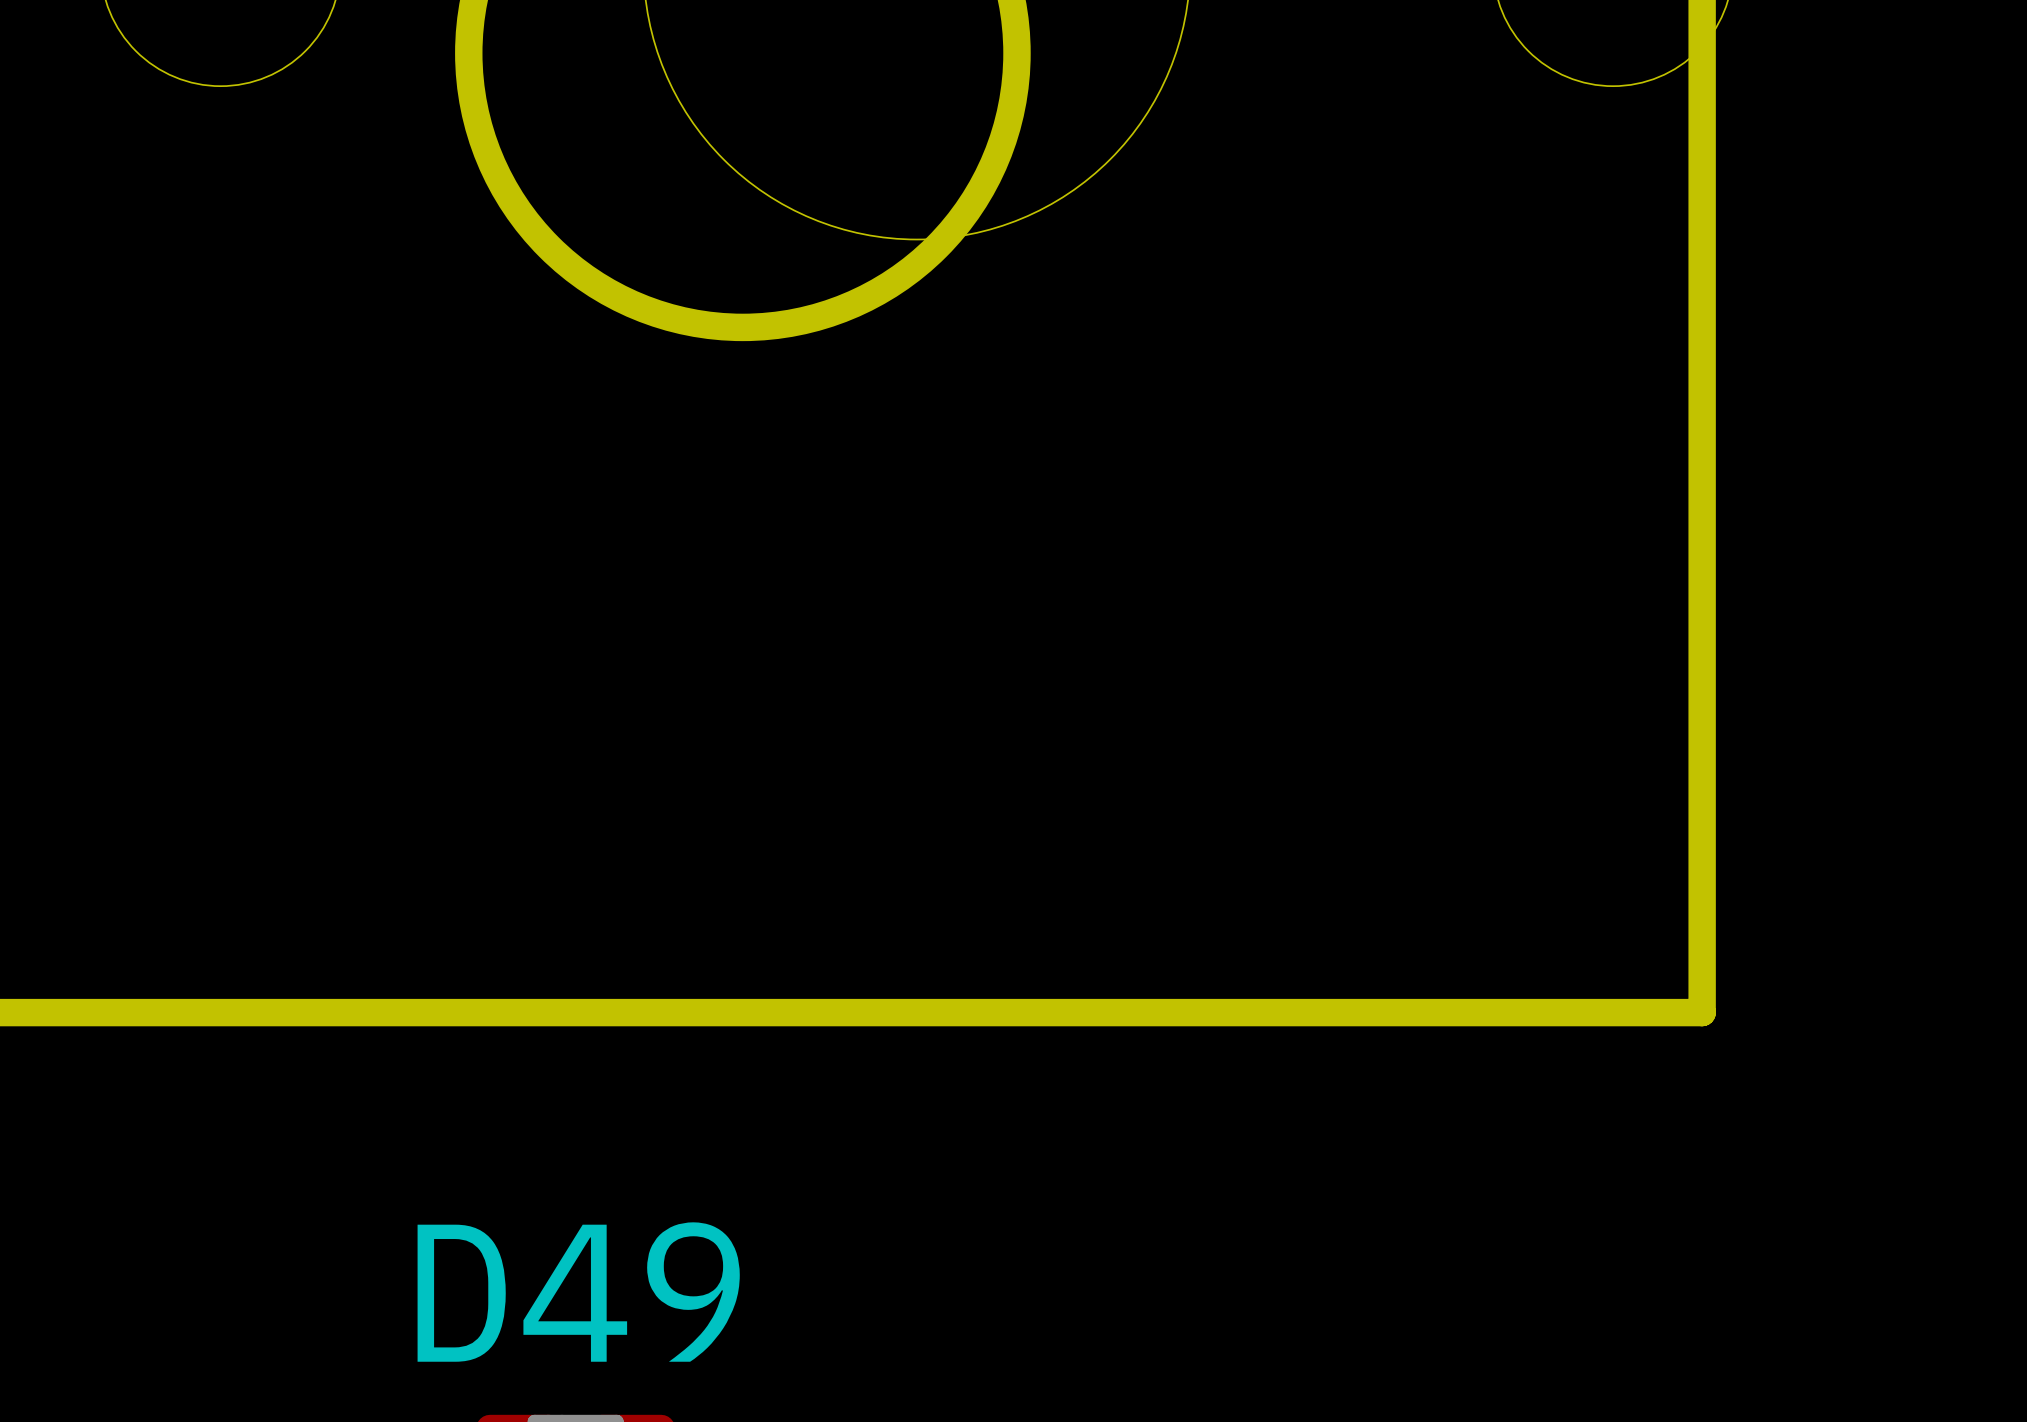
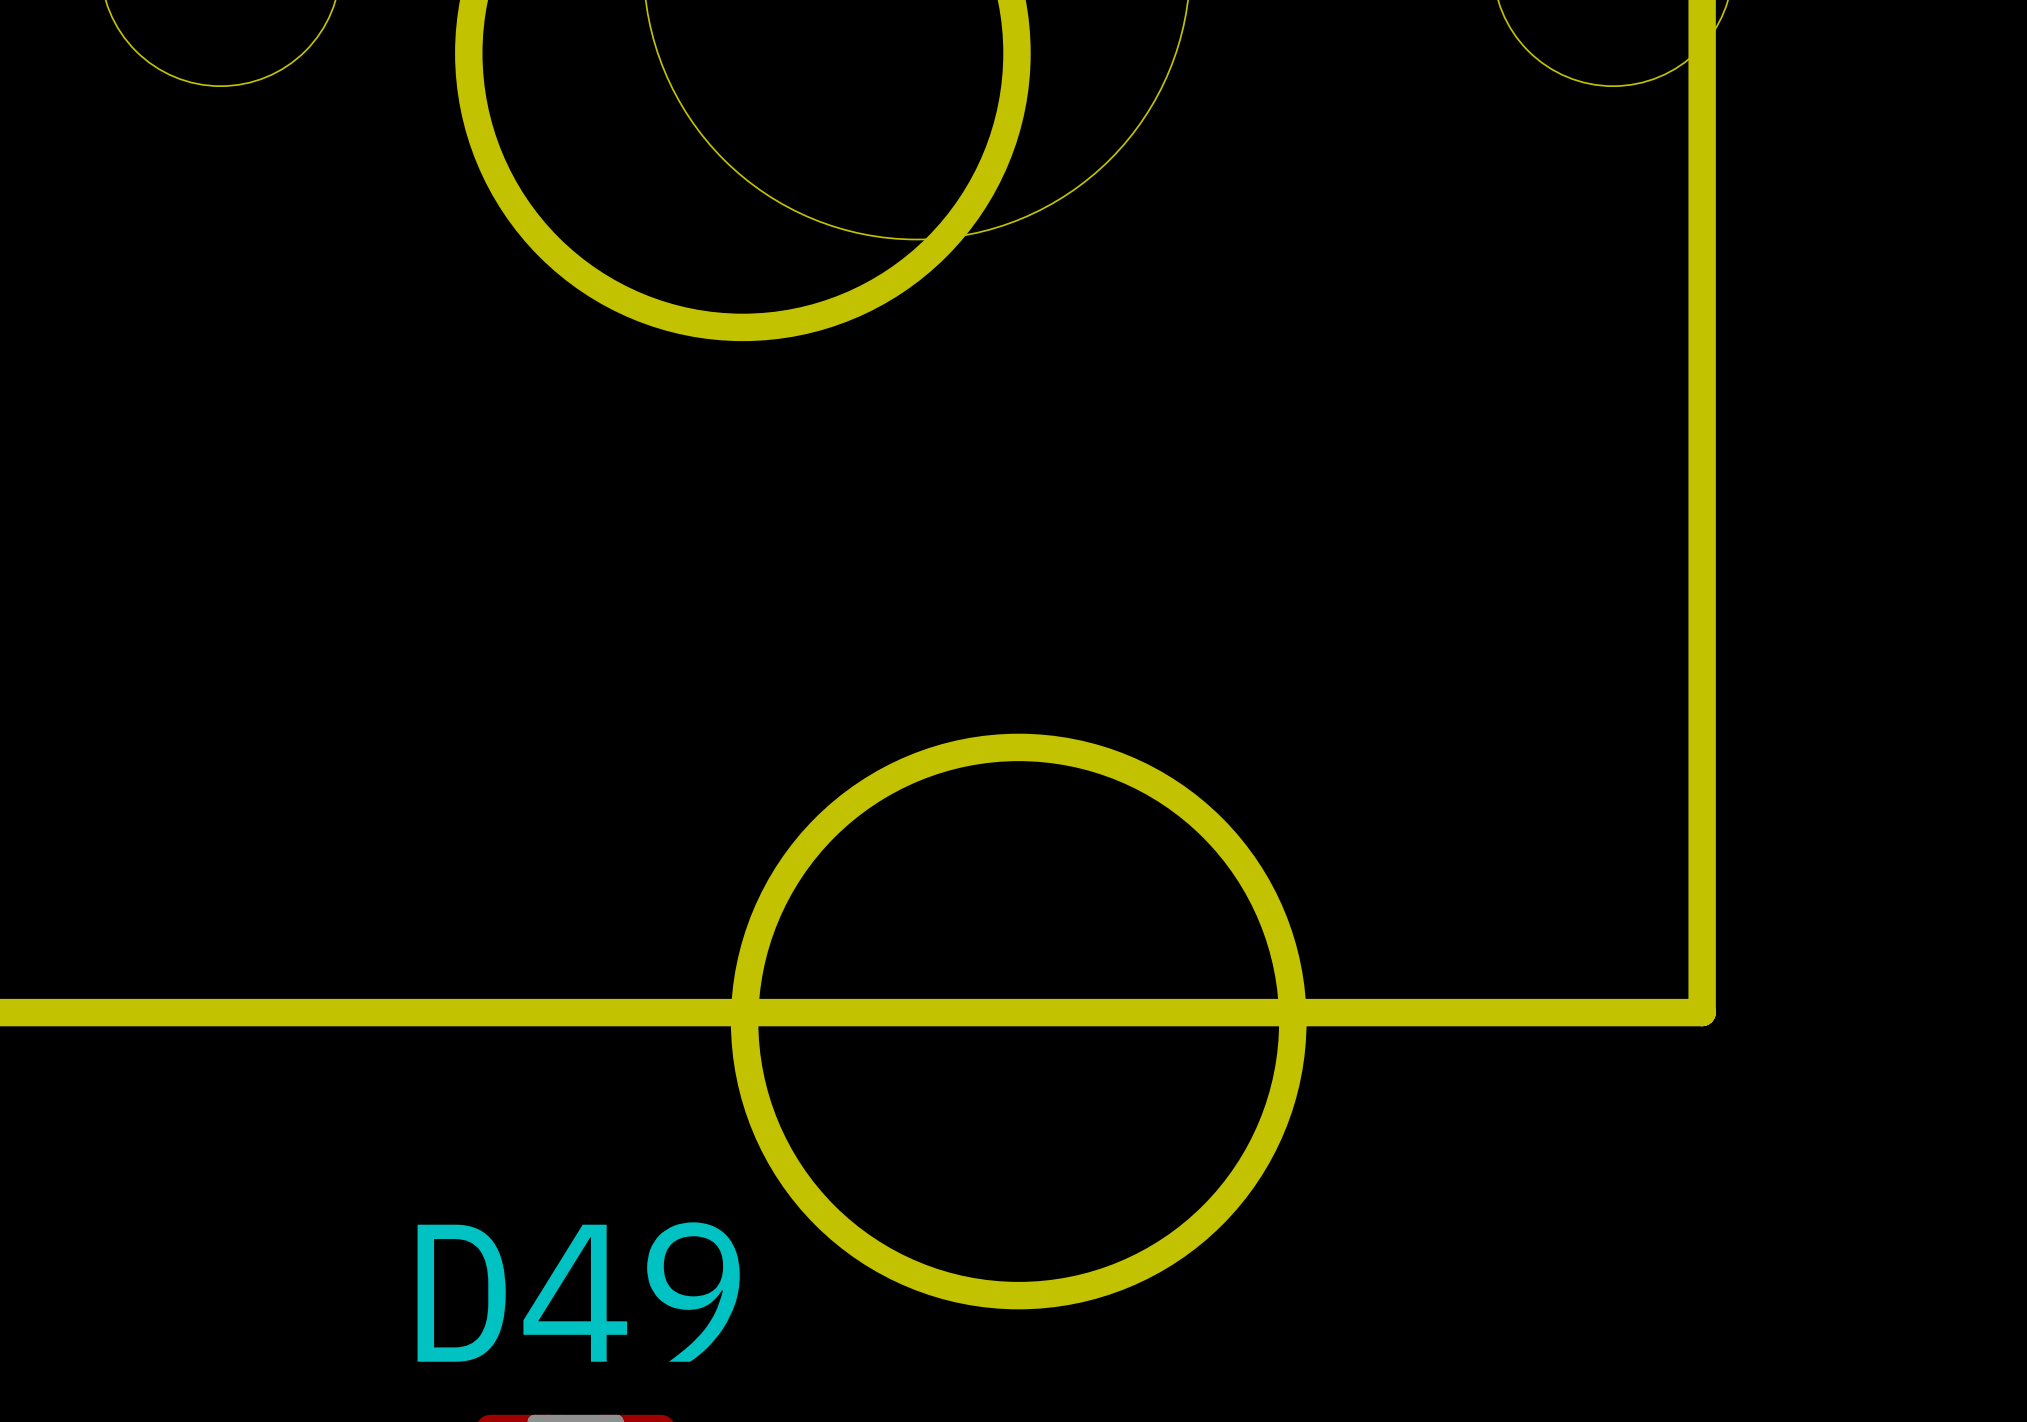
round board edge: none -> [730, 733, 1307, 1310]

